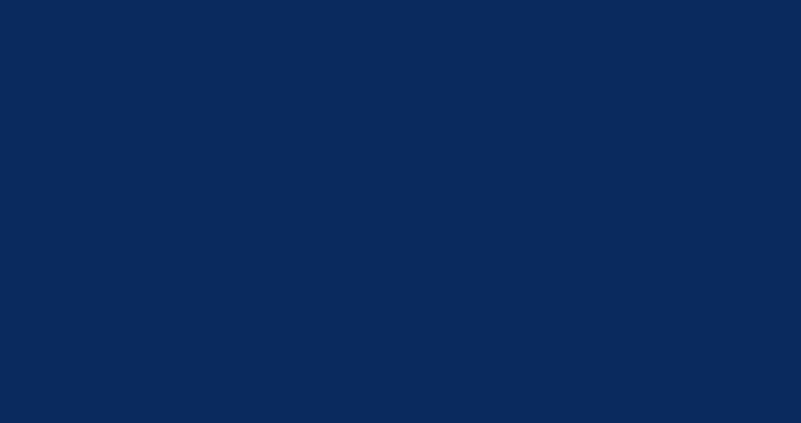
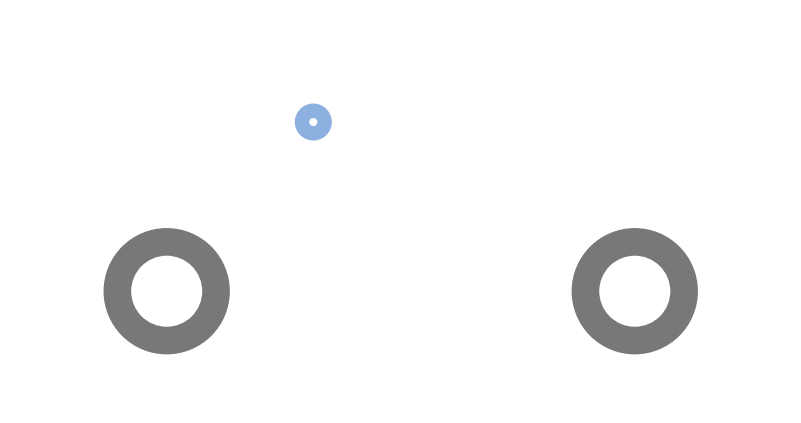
drawing: none -> [294, 103, 332, 141]
via: none -> (166, 291)
via: none -> (634, 291)

